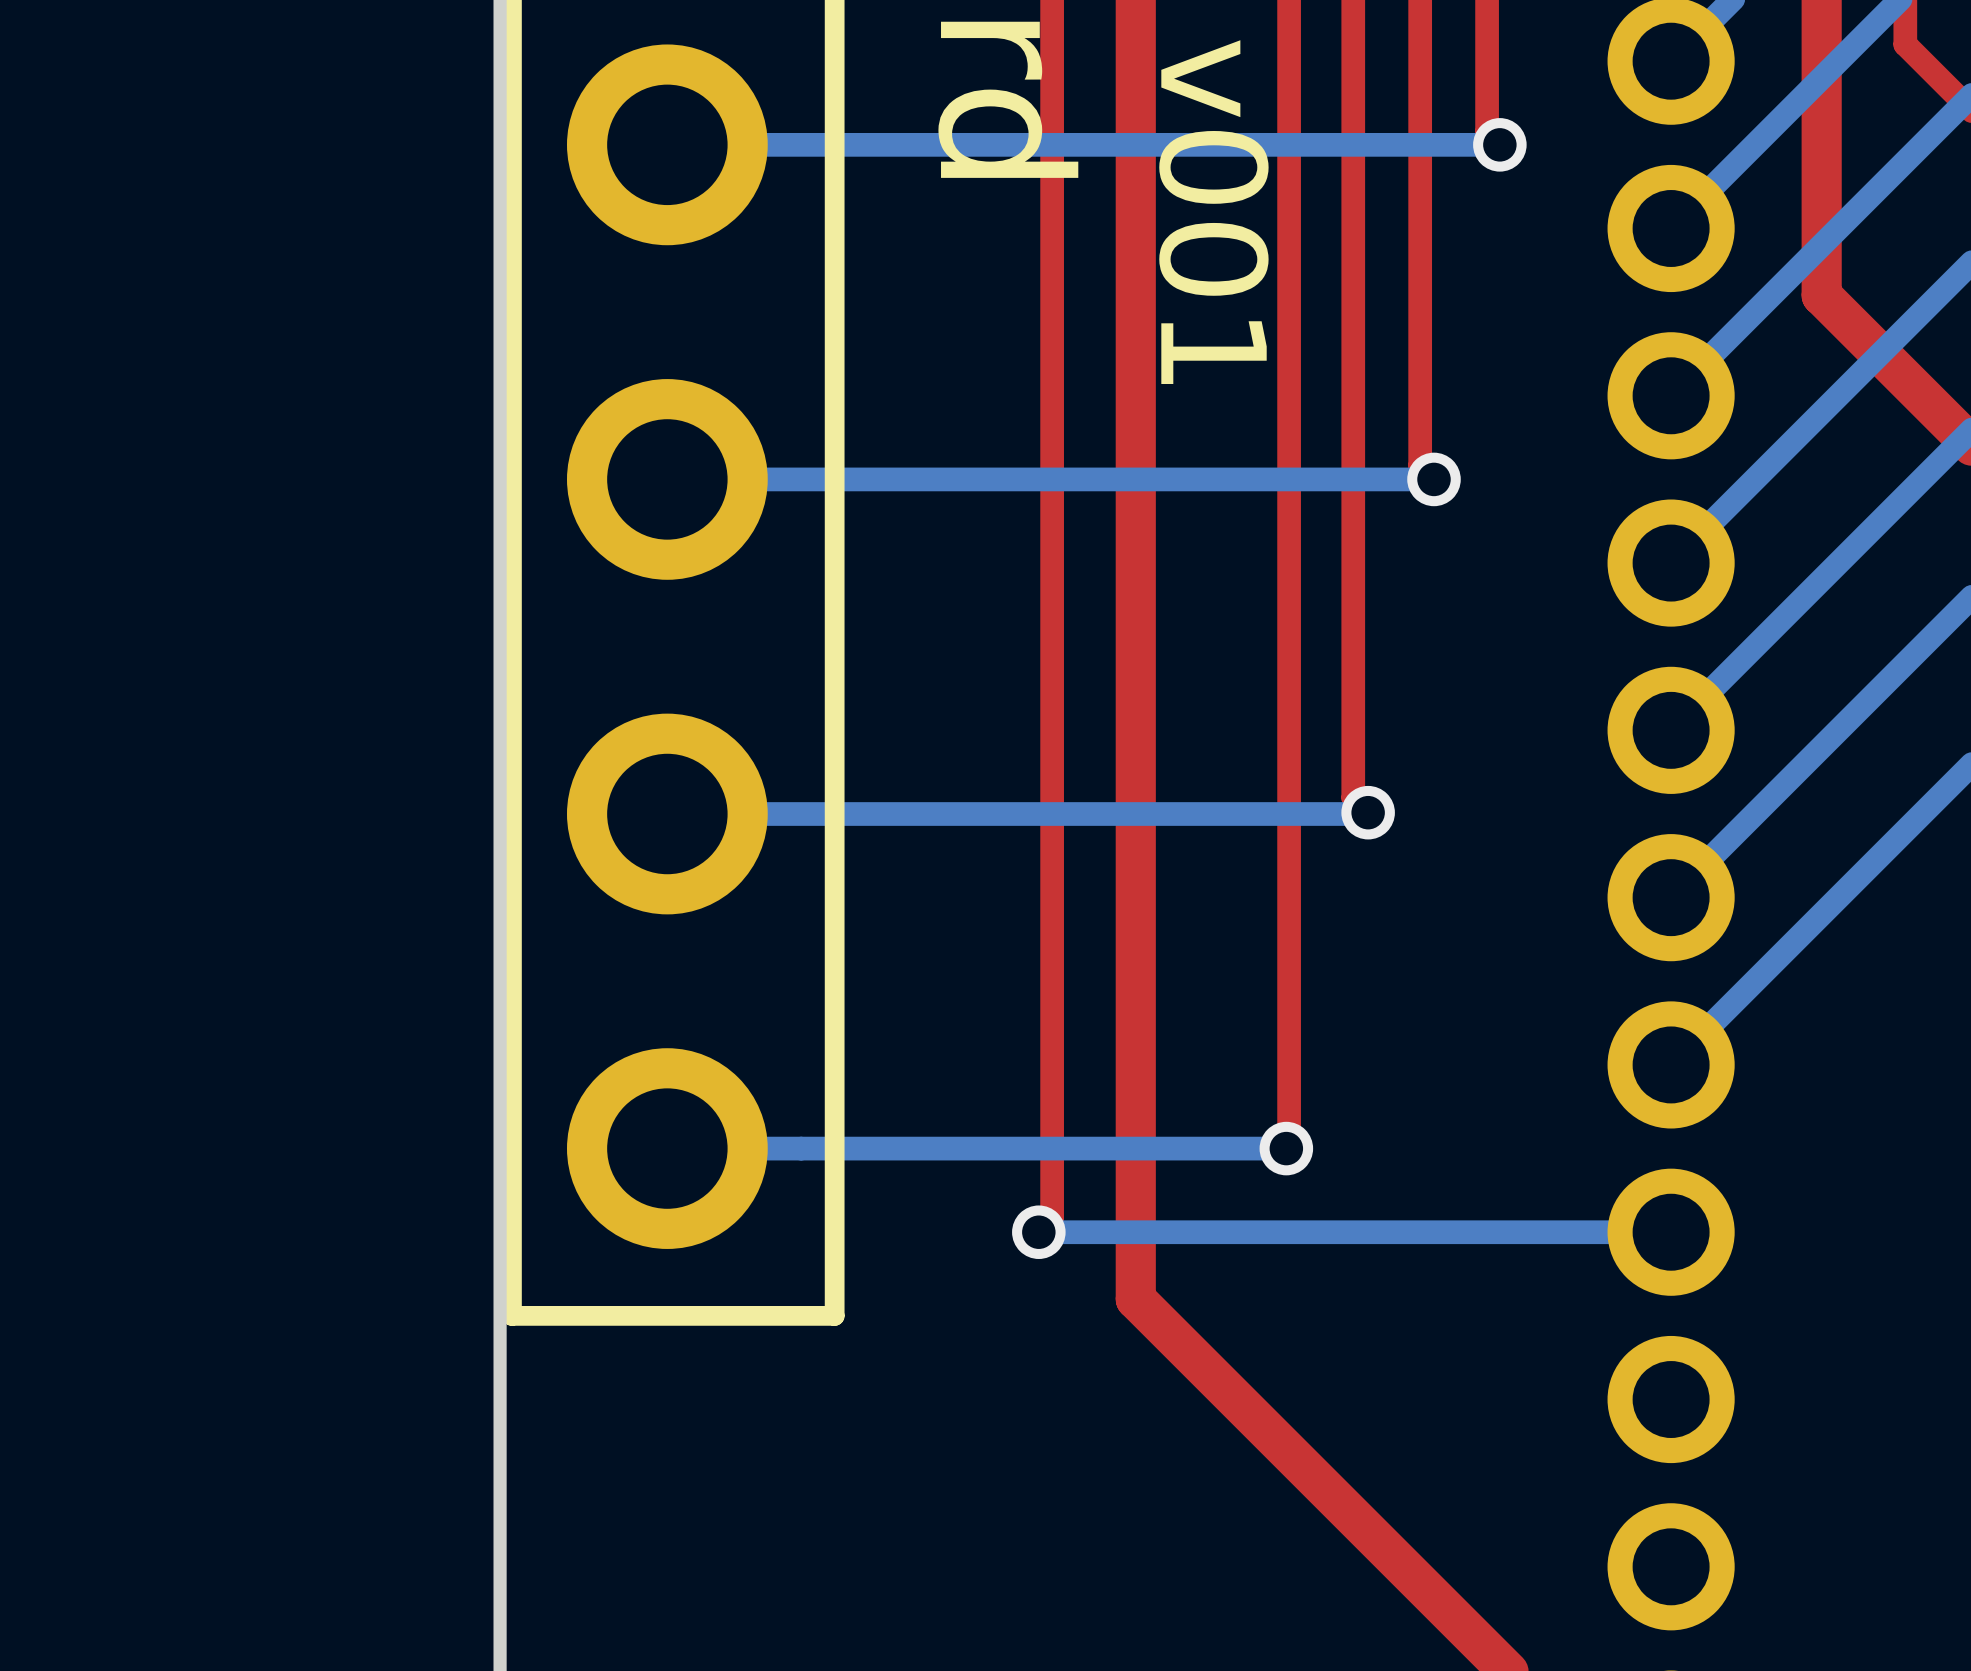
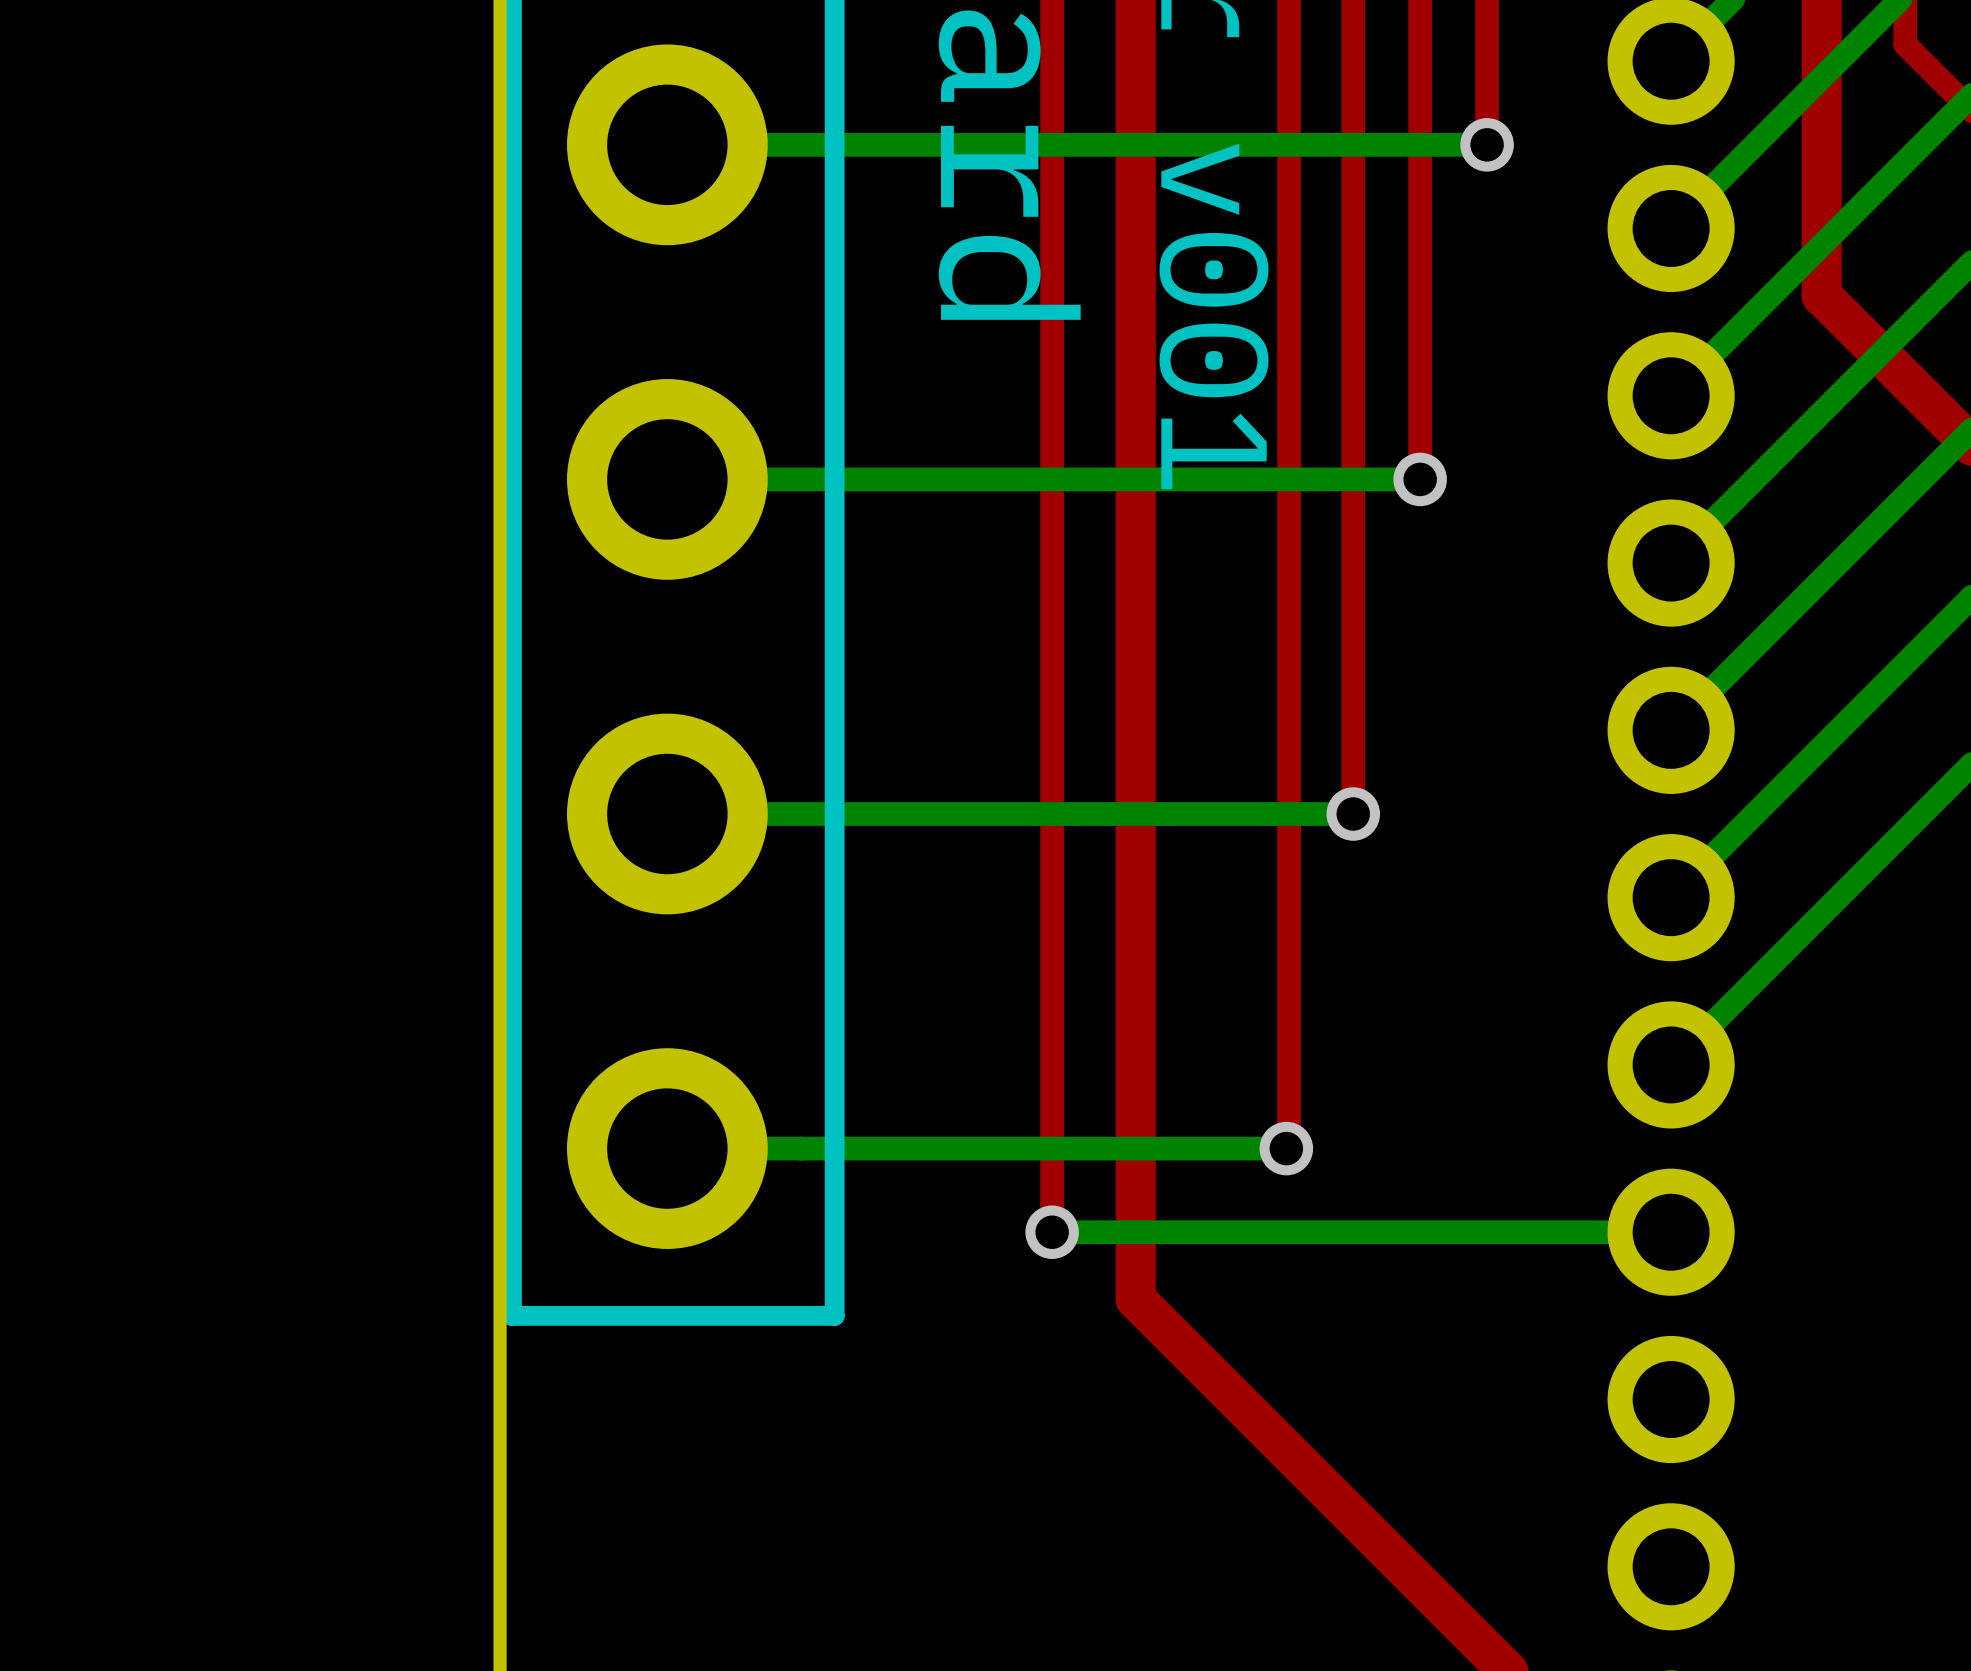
via position: (1499, 144) -> (1487, 144)
via position: (1434, 479) -> (1420, 479)
via position: (1368, 812) -> (1353, 814)
via position: (1038, 1232) -> (1052, 1232)

